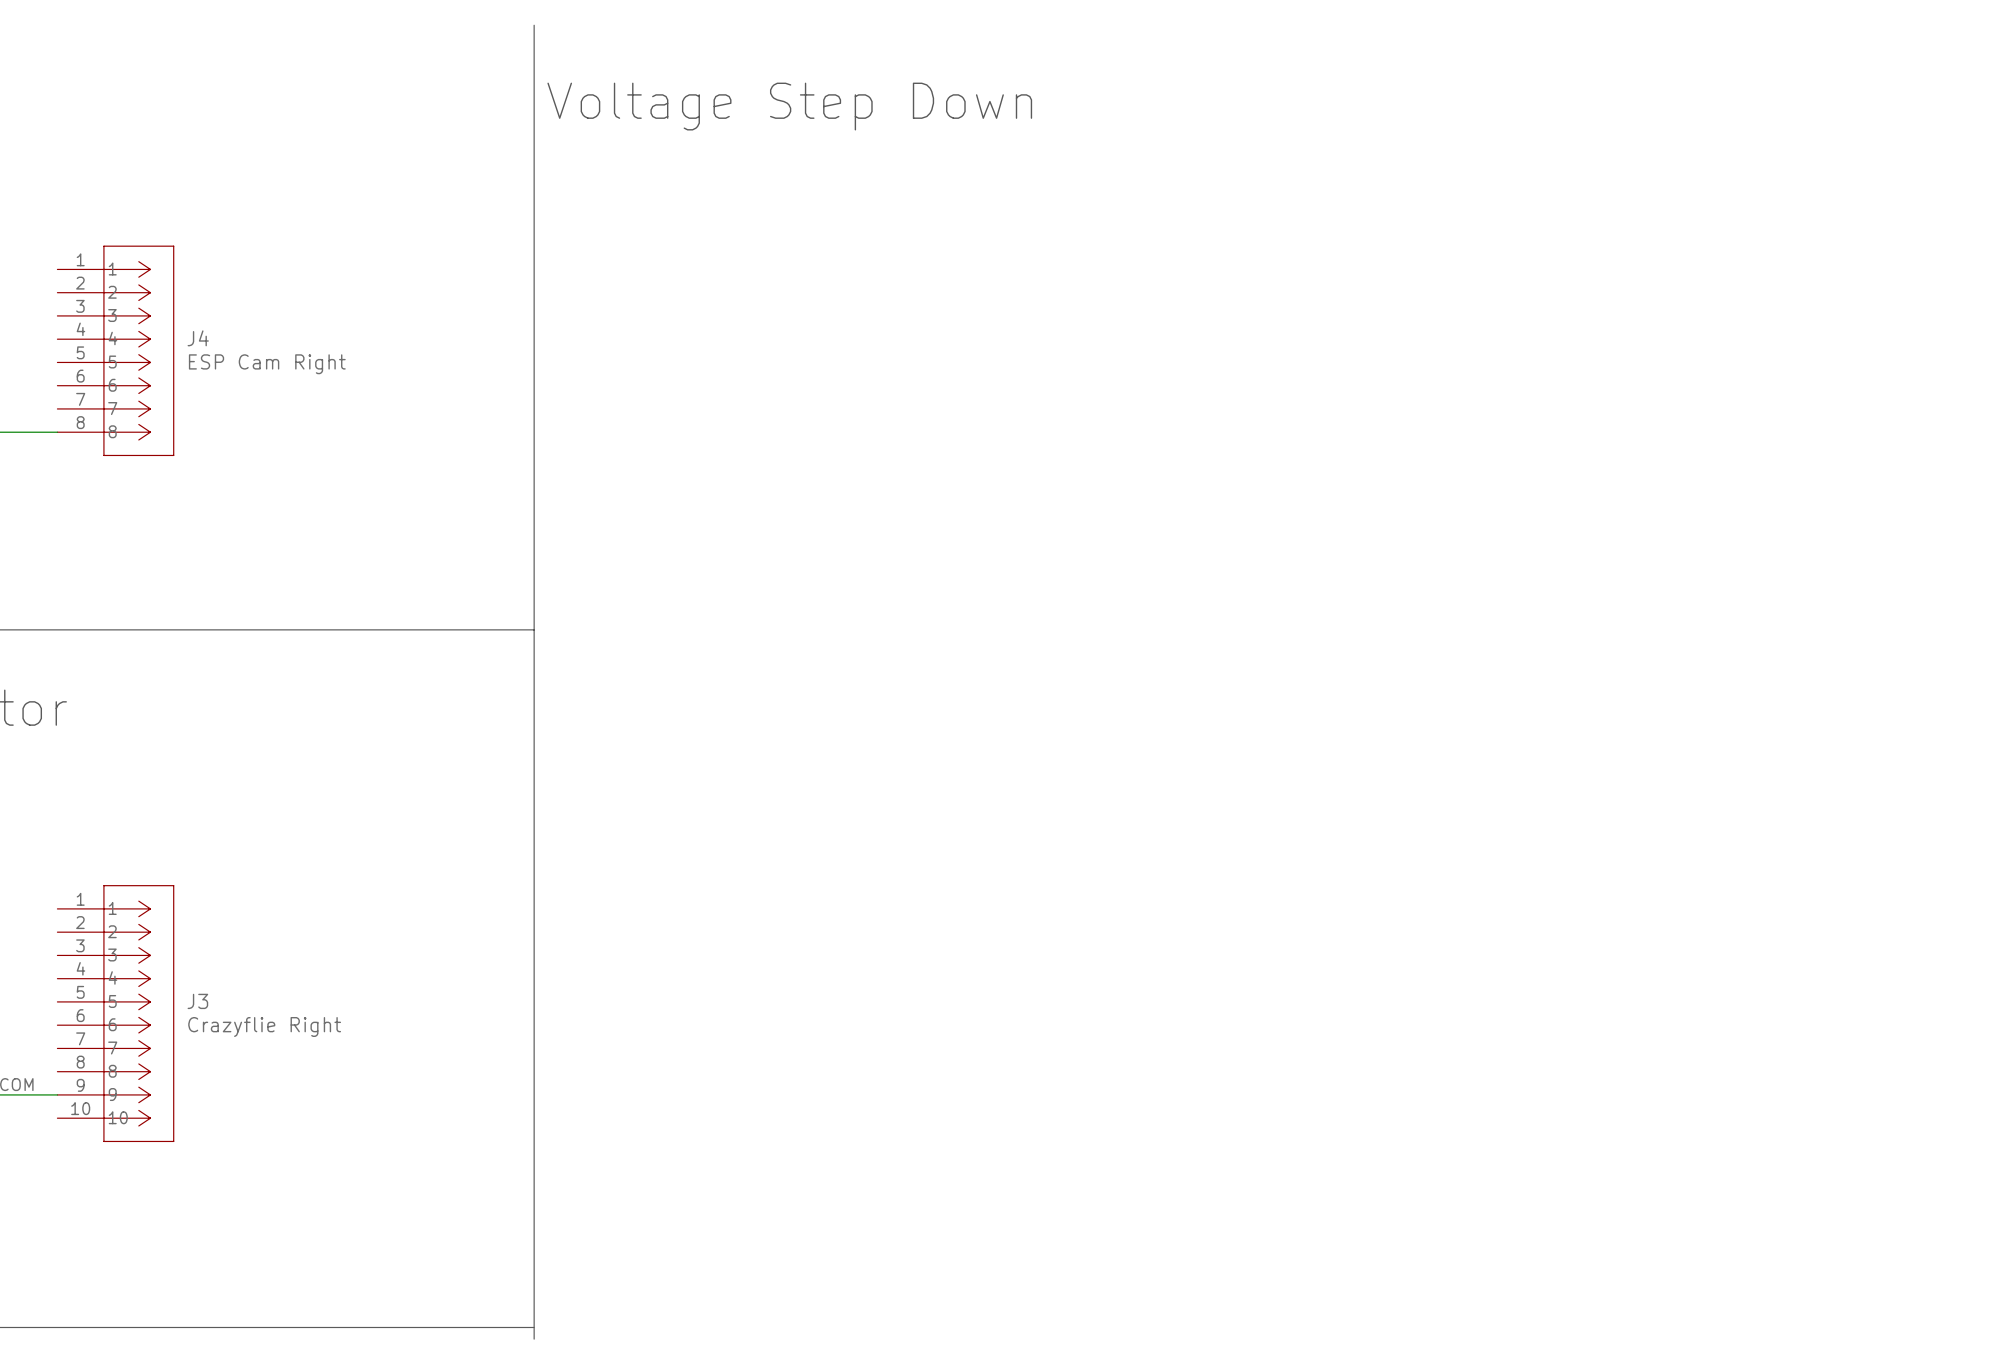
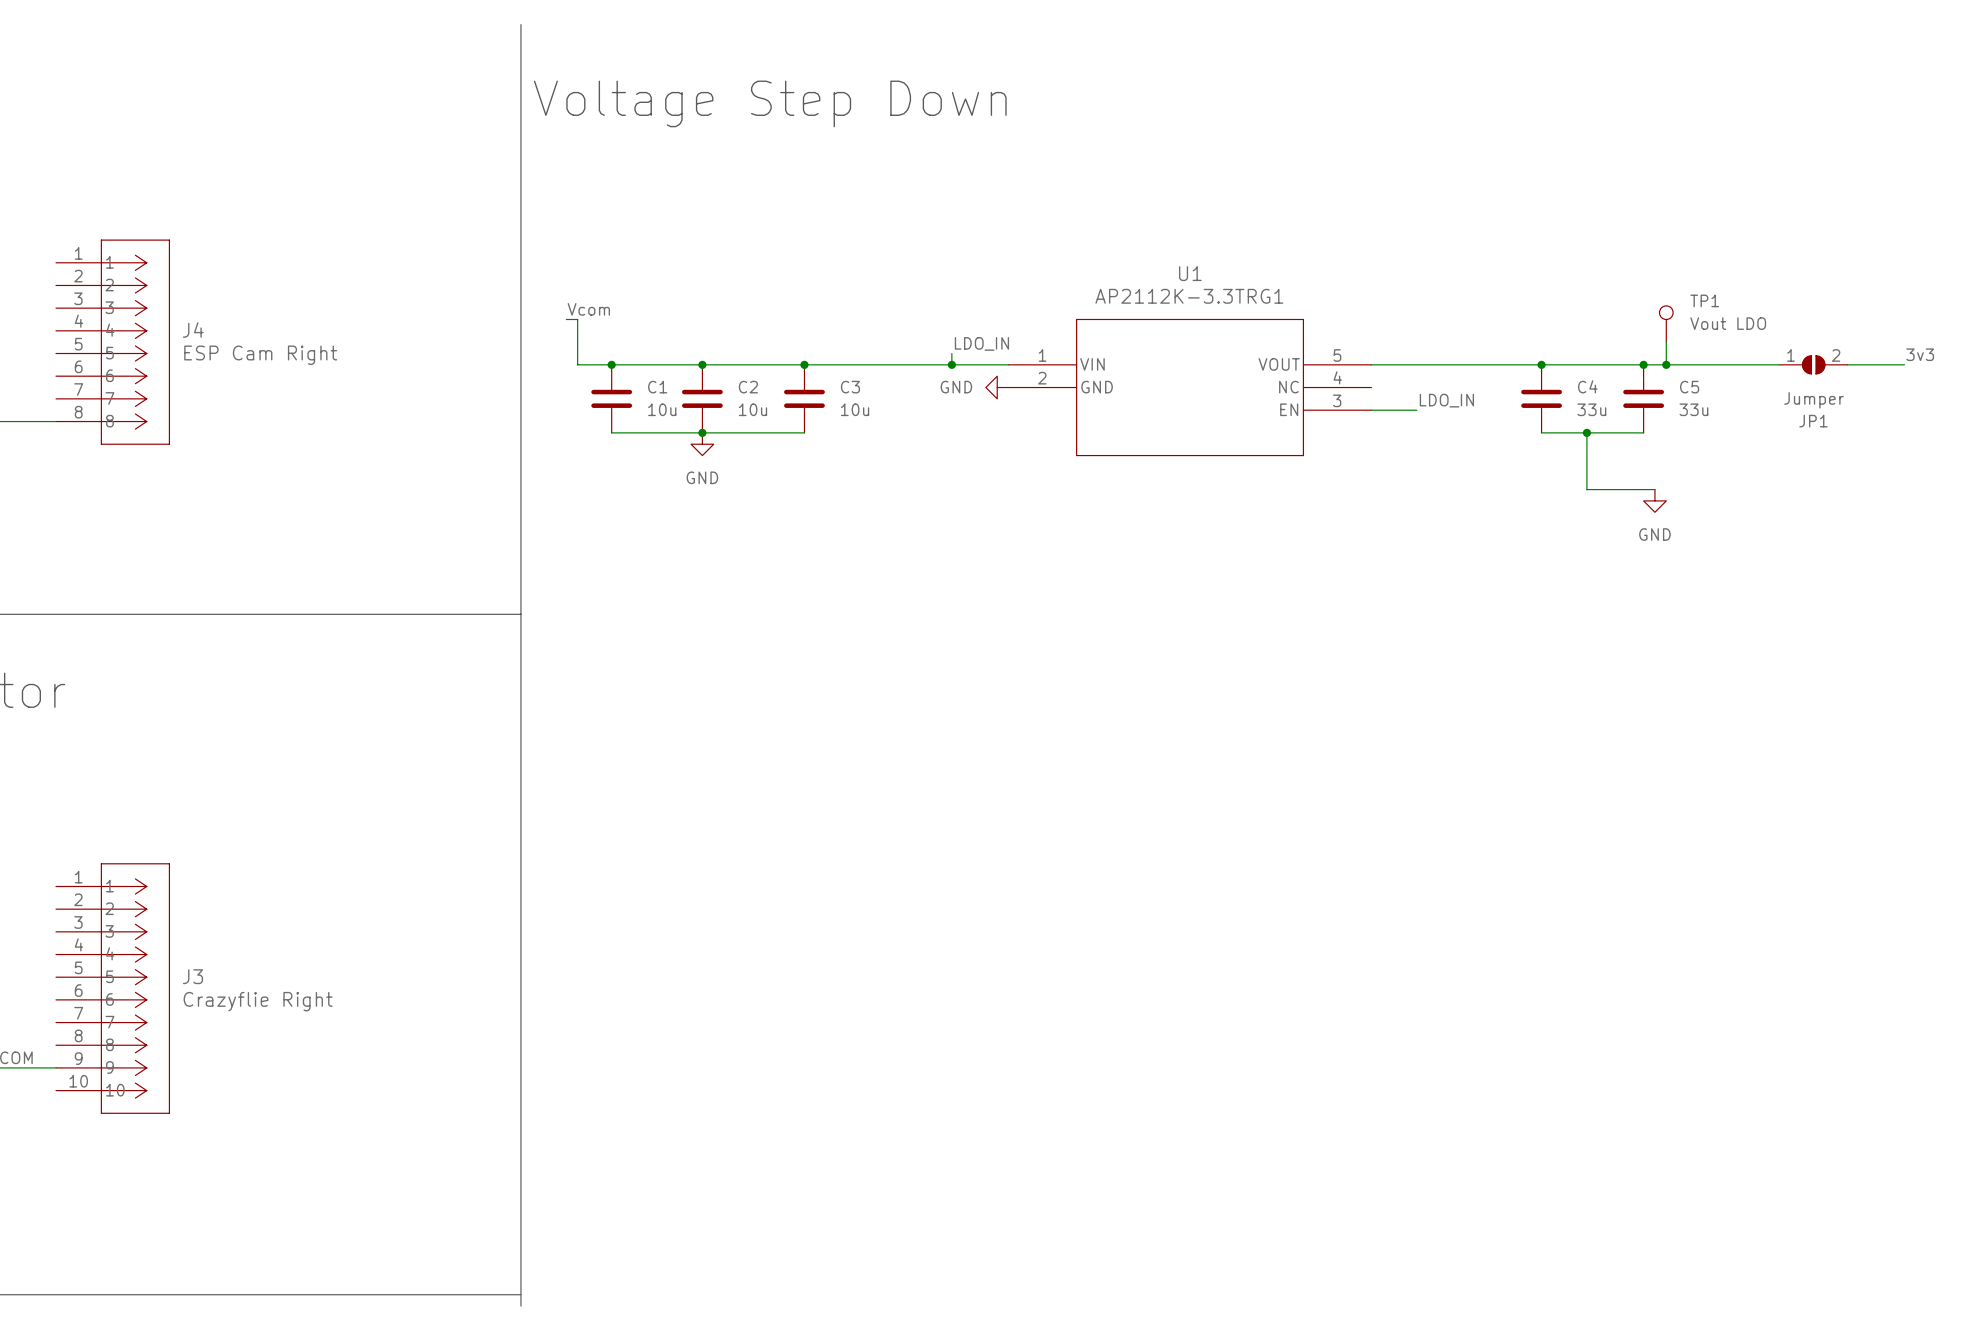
label: none -> Vcom (588, 309)
wire: none -> (566, 319) (577, 319) (577, 364) (1008, 364)
TP1: none -> Vout LDO (1666, 324)
wire: none -> (1666, 342) (1666, 364)
label: none -> LDO_IN (981, 343)
wire: none -> (951, 353) (951, 364)
label: none -> 3v3 (1920, 354)
junction: none -> (611, 364)
junction: none -> (702, 364)
junction: none -> (804, 364)
junction: none -> (951, 364)
wire: none -> (1371, 364) (1779, 364)
junction: none -> (1541, 364)
junction: none -> (1643, 364)
junction: none -> (1666, 364)
JP1: none -> Jumper (1813, 364)
wire: none -> (1847, 364) (1904, 364)
power symbol: none -> GND (997, 387)
U1: none -> AP2112K-3.3TRG1 (1190, 387)
C1: none -> 10u (611, 398)
C2: none -> 10u (702, 398)
C3: none -> 10u (804, 398)
C4: none -> 33u (1541, 398)
C5: none -> 33u (1643, 398)
label: none -> LDO_IN (1446, 400)
wire: none -> (1371, 410) (1416, 410)
wire: none -> (611, 432) (804, 432)
junction: none -> (702, 432)
wire: none -> (1541, 432) (1643, 432)
wire: none -> (1586, 432) (1586, 489) (1654, 489)
junction: none -> (1586, 432)
power symbol: none -> GND (702, 444)
power symbol: none -> GND (1654, 500)

